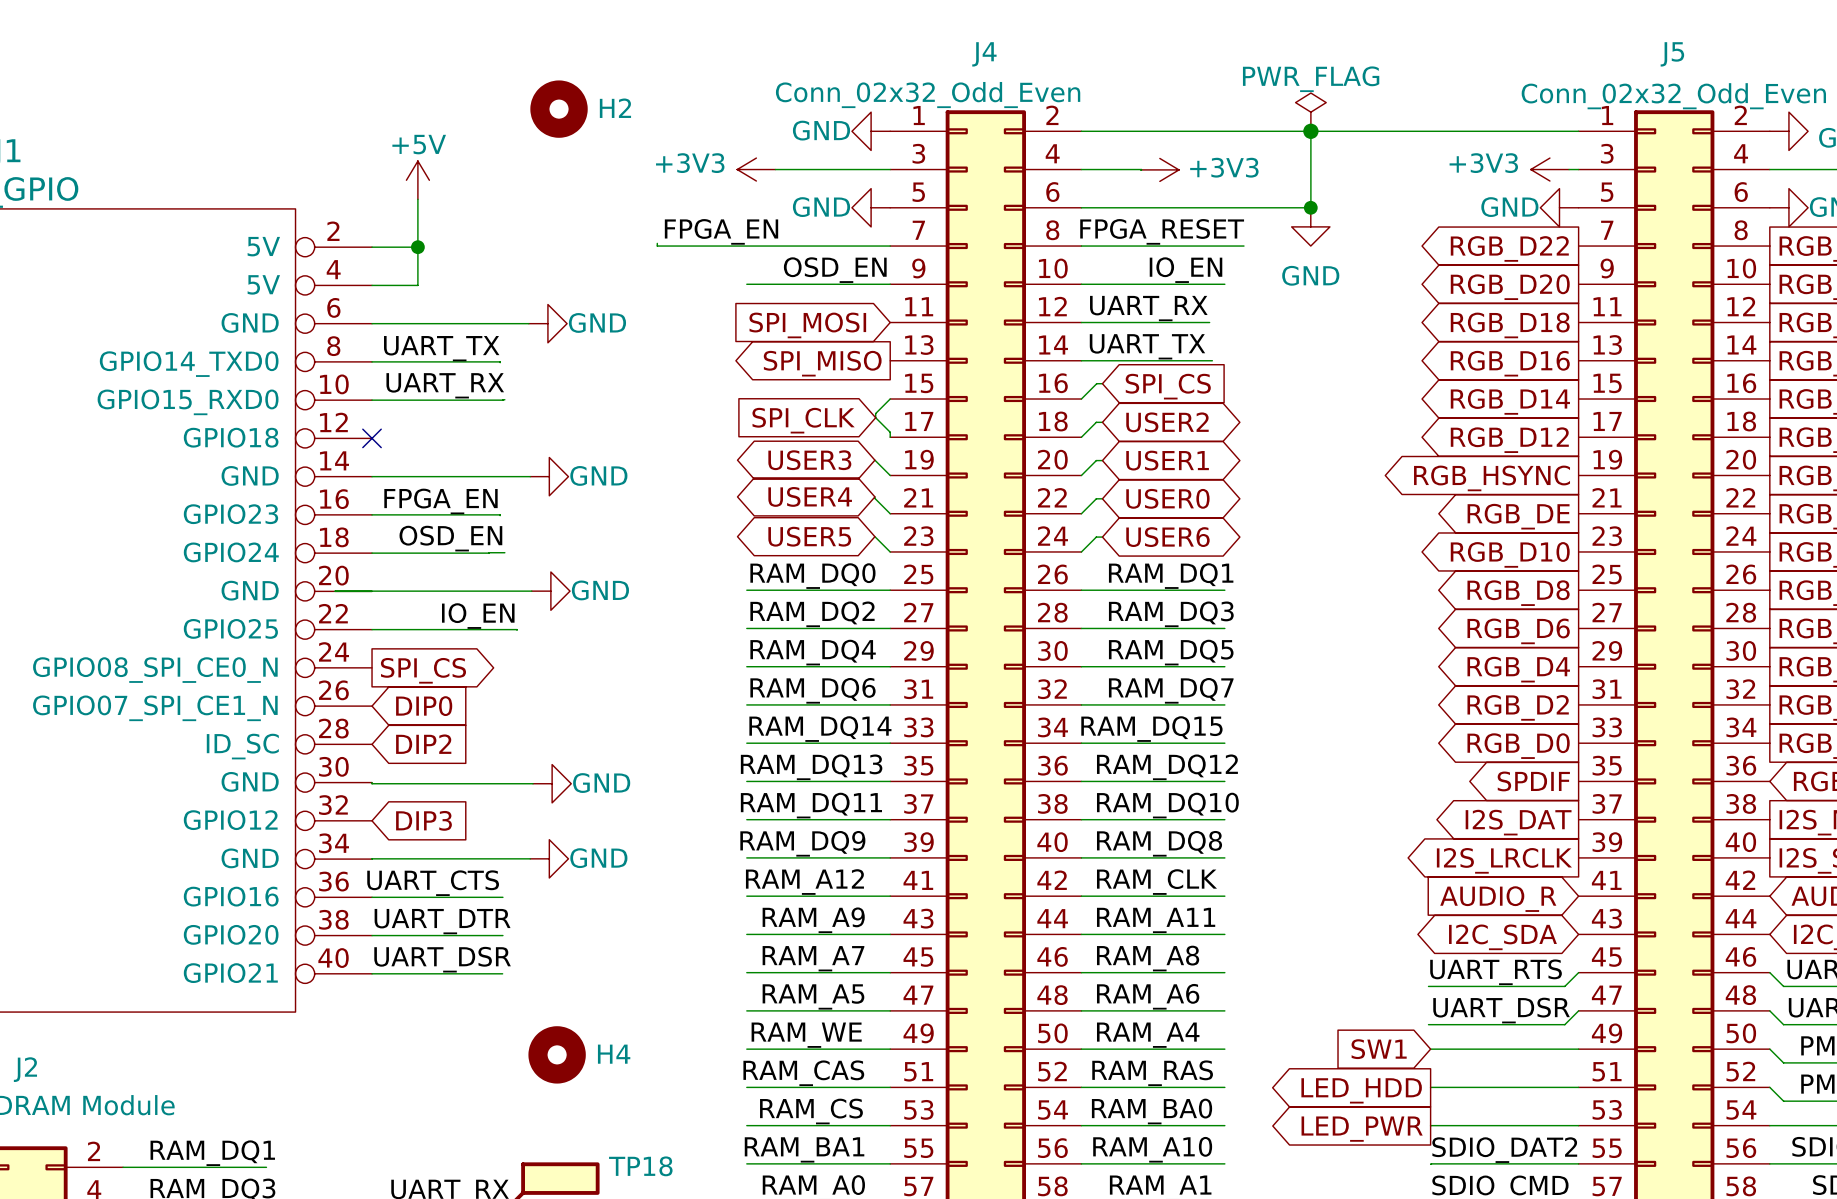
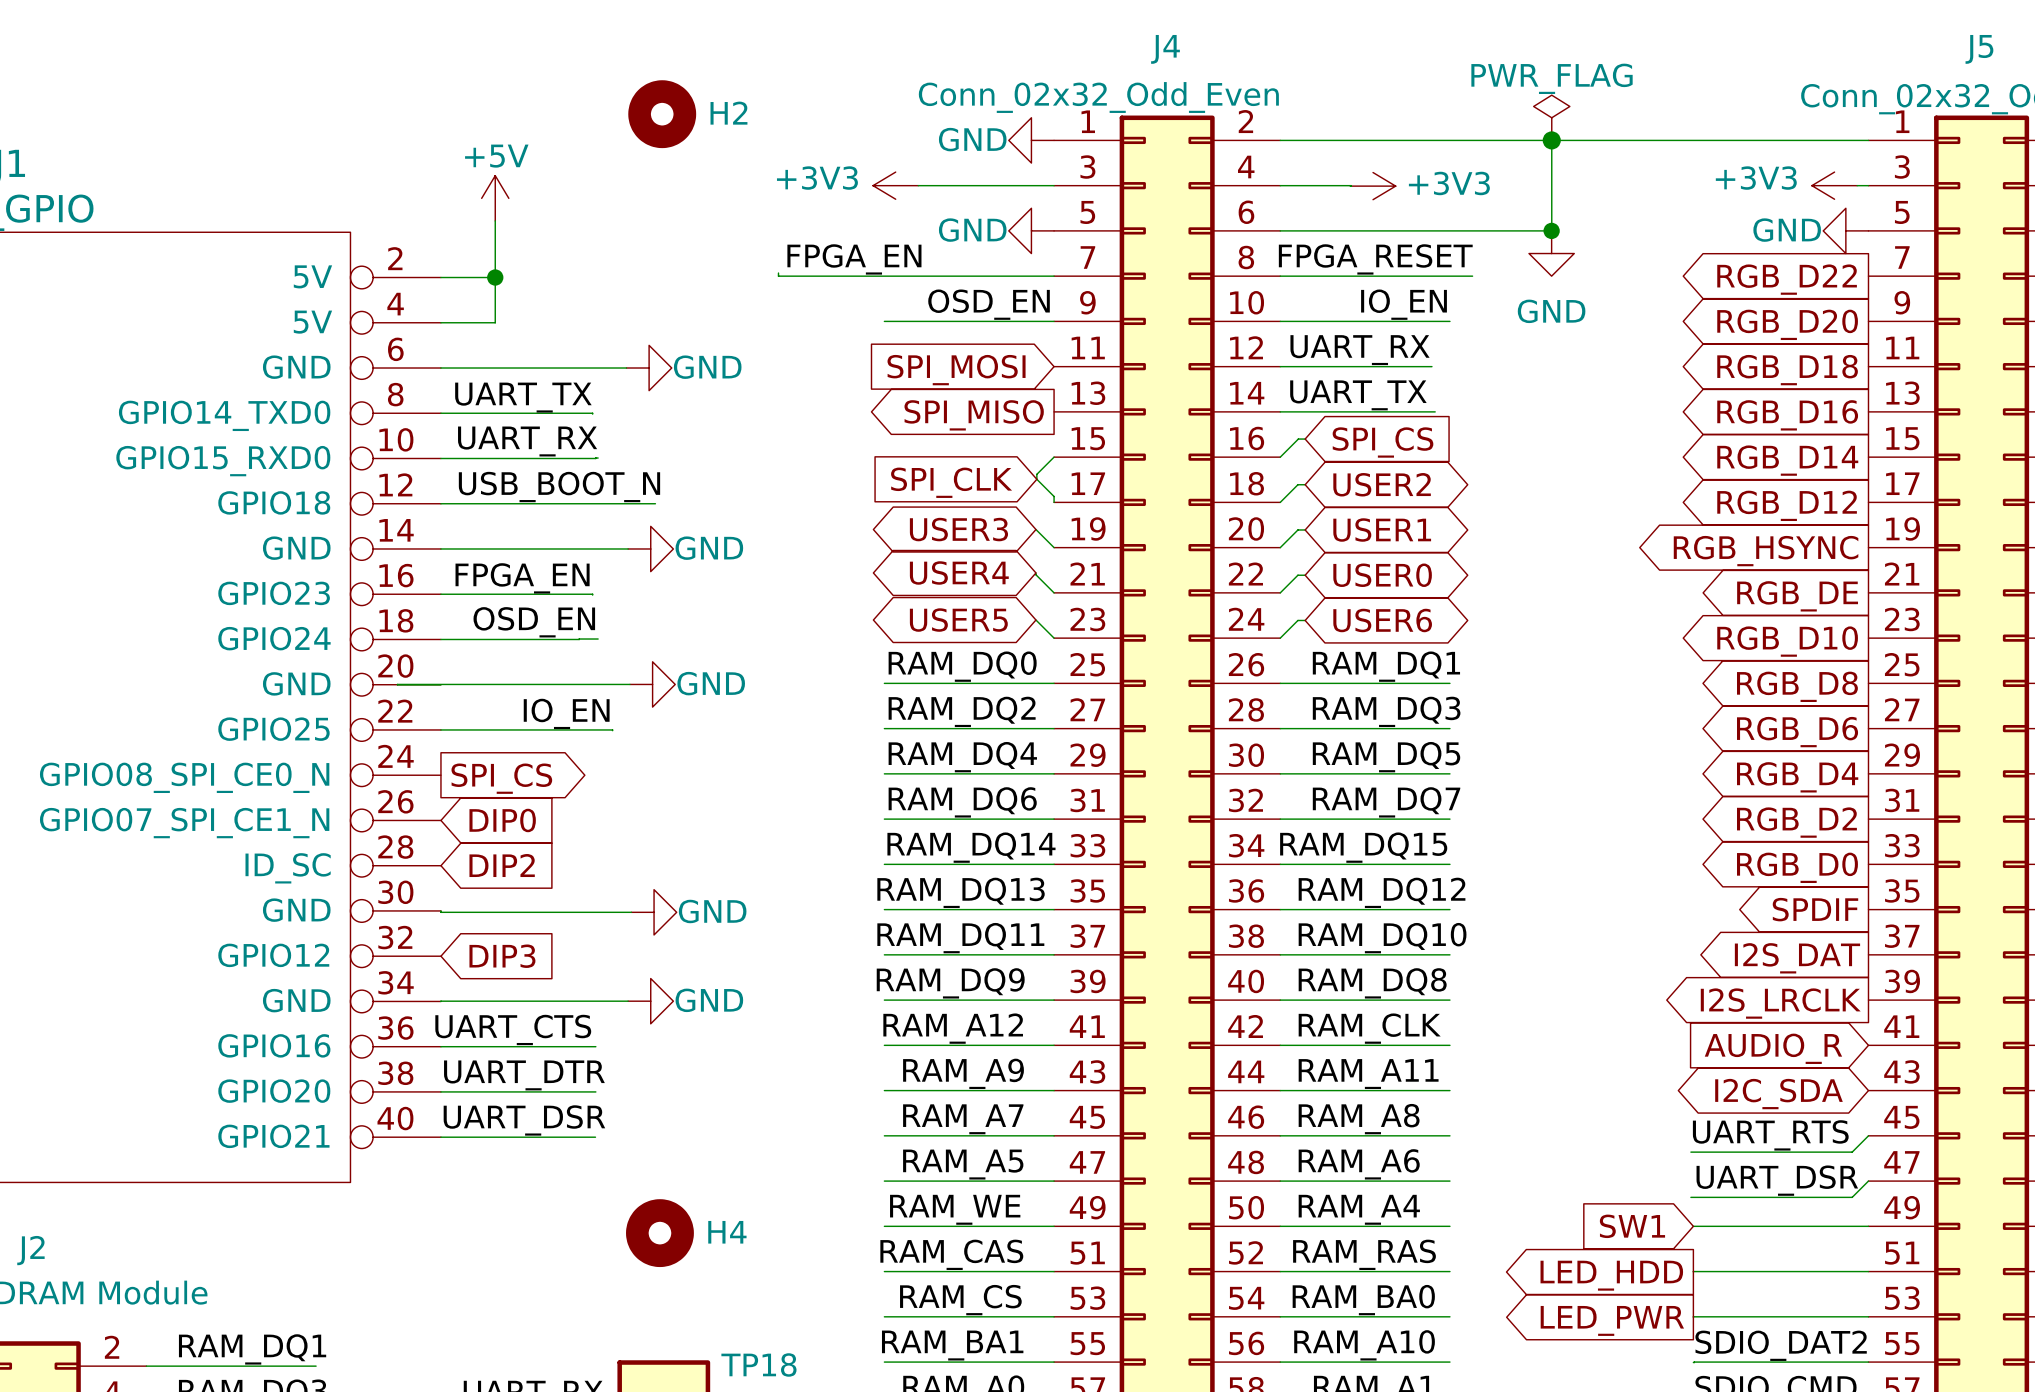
label: none -> USB_BOOT_N (559, 487)
wire: none -> (440, 503) (655, 503)
no-connect mark: (372, 438) -> none

